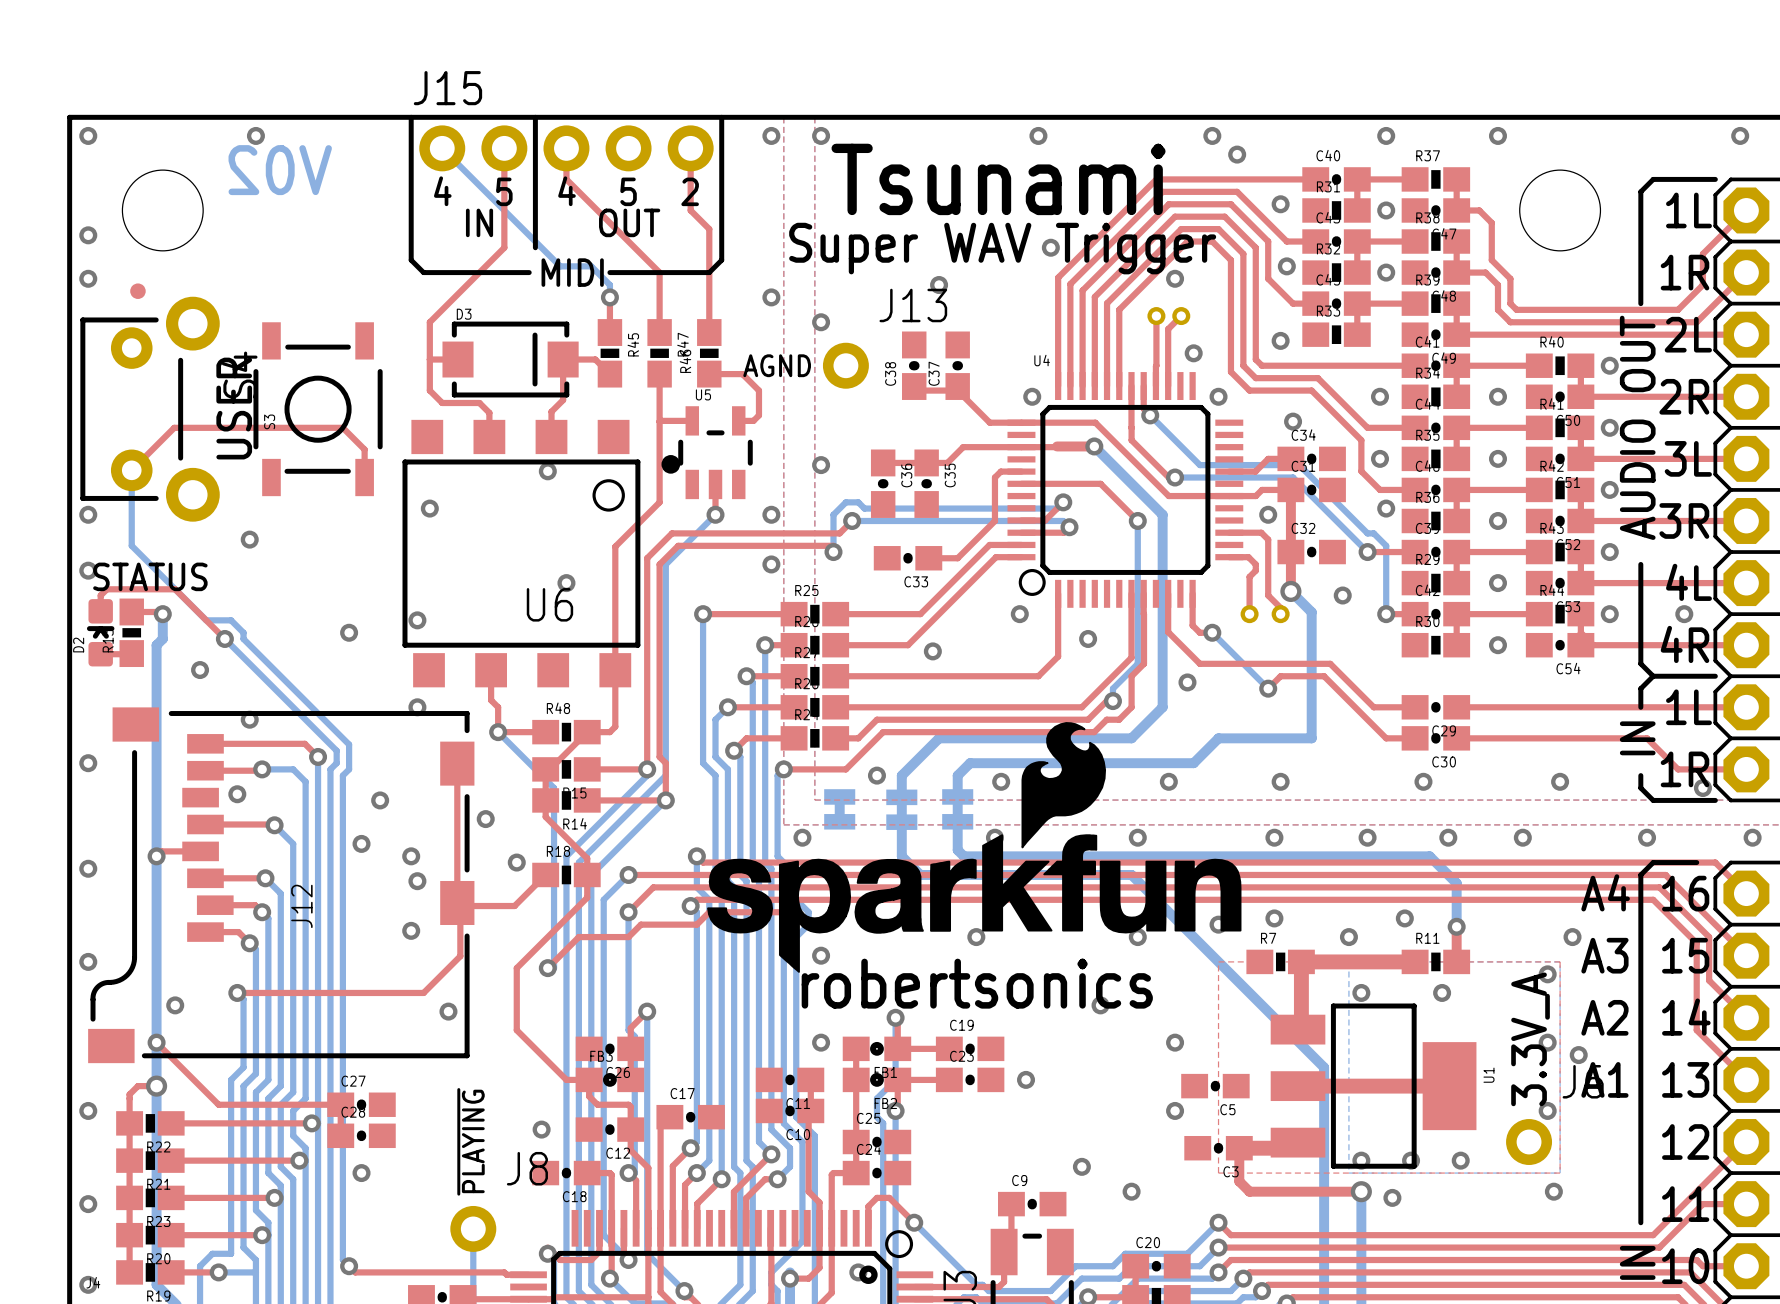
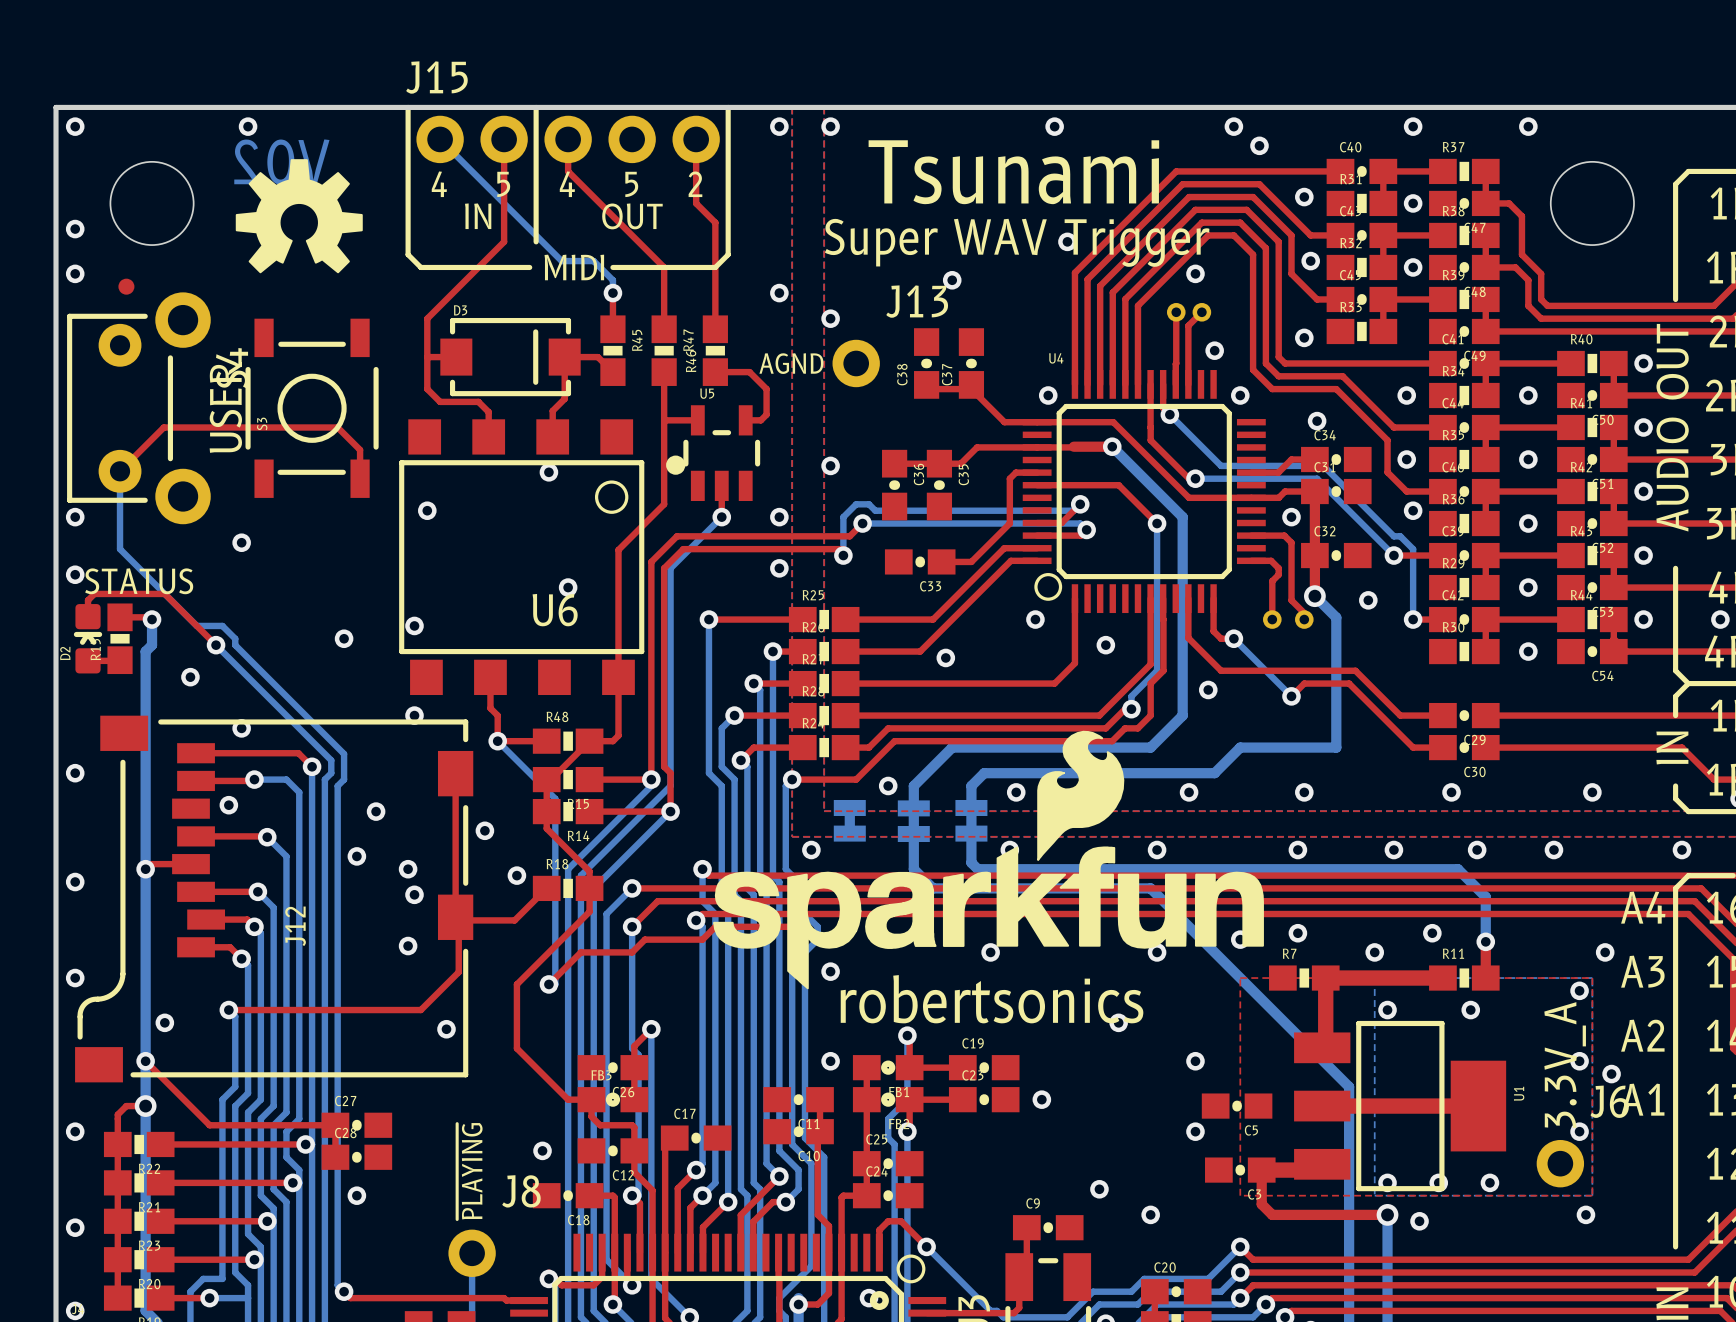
drawing: none -> [235, 159, 363, 274]

